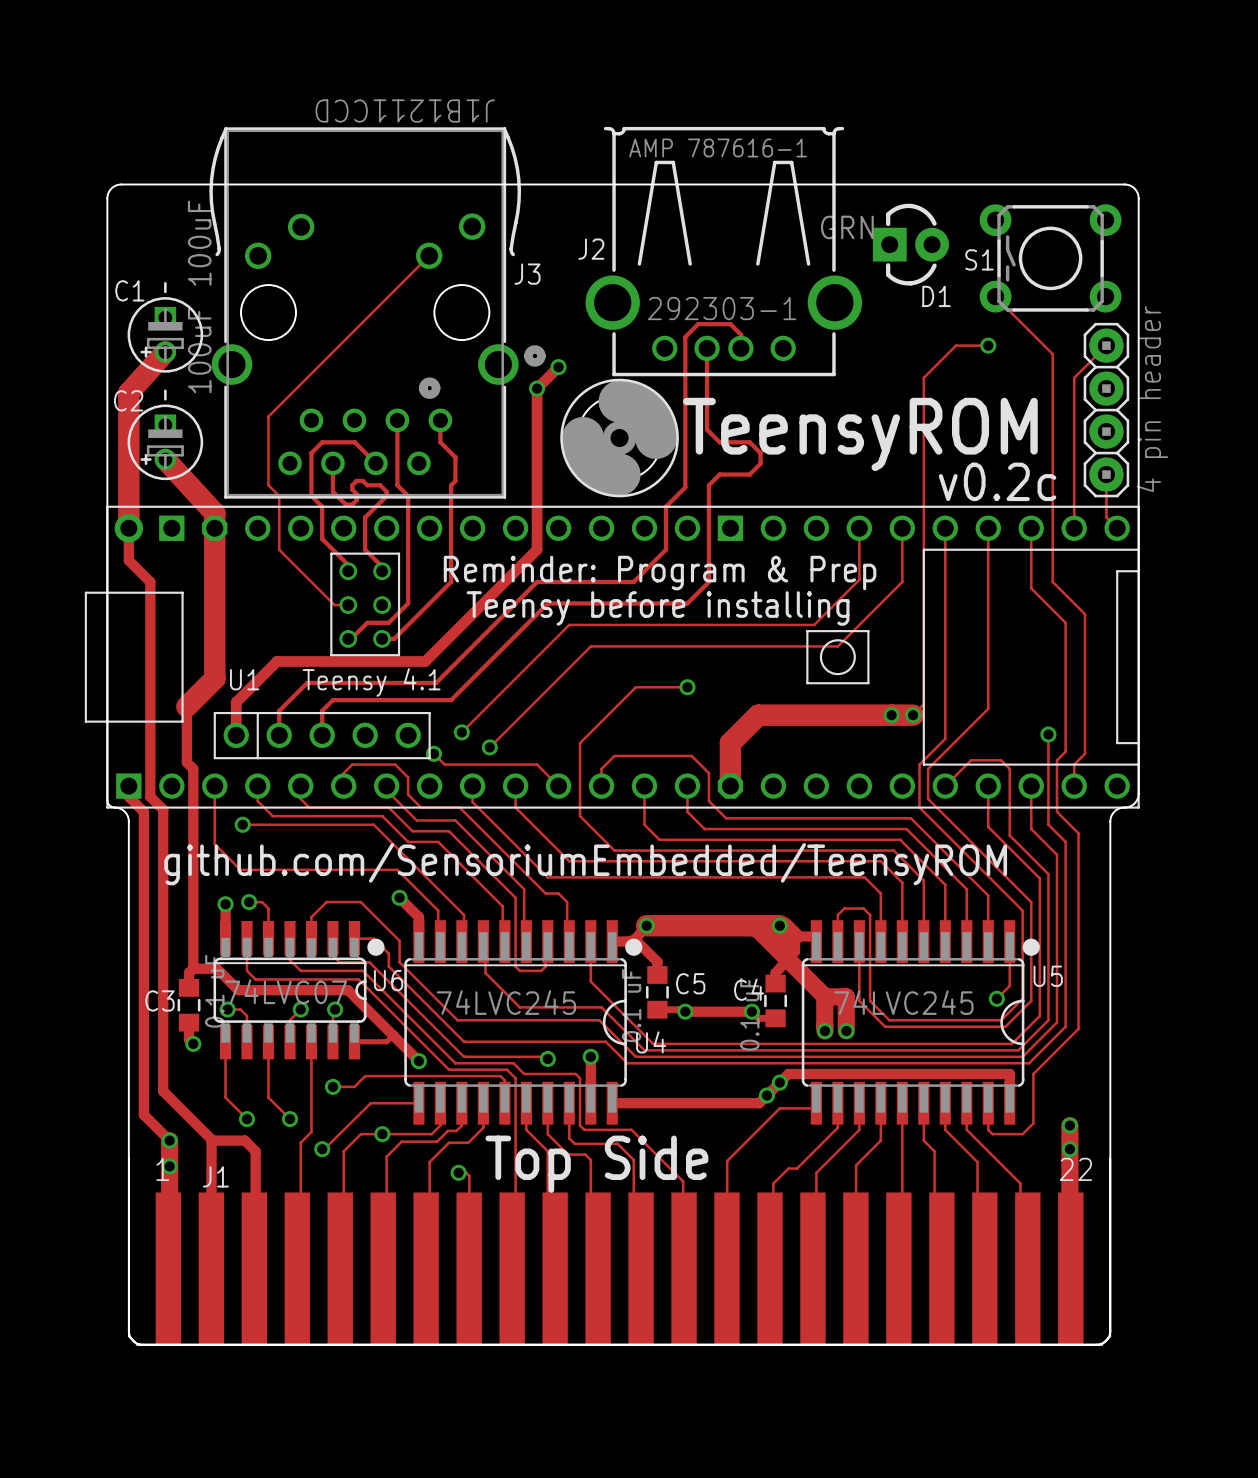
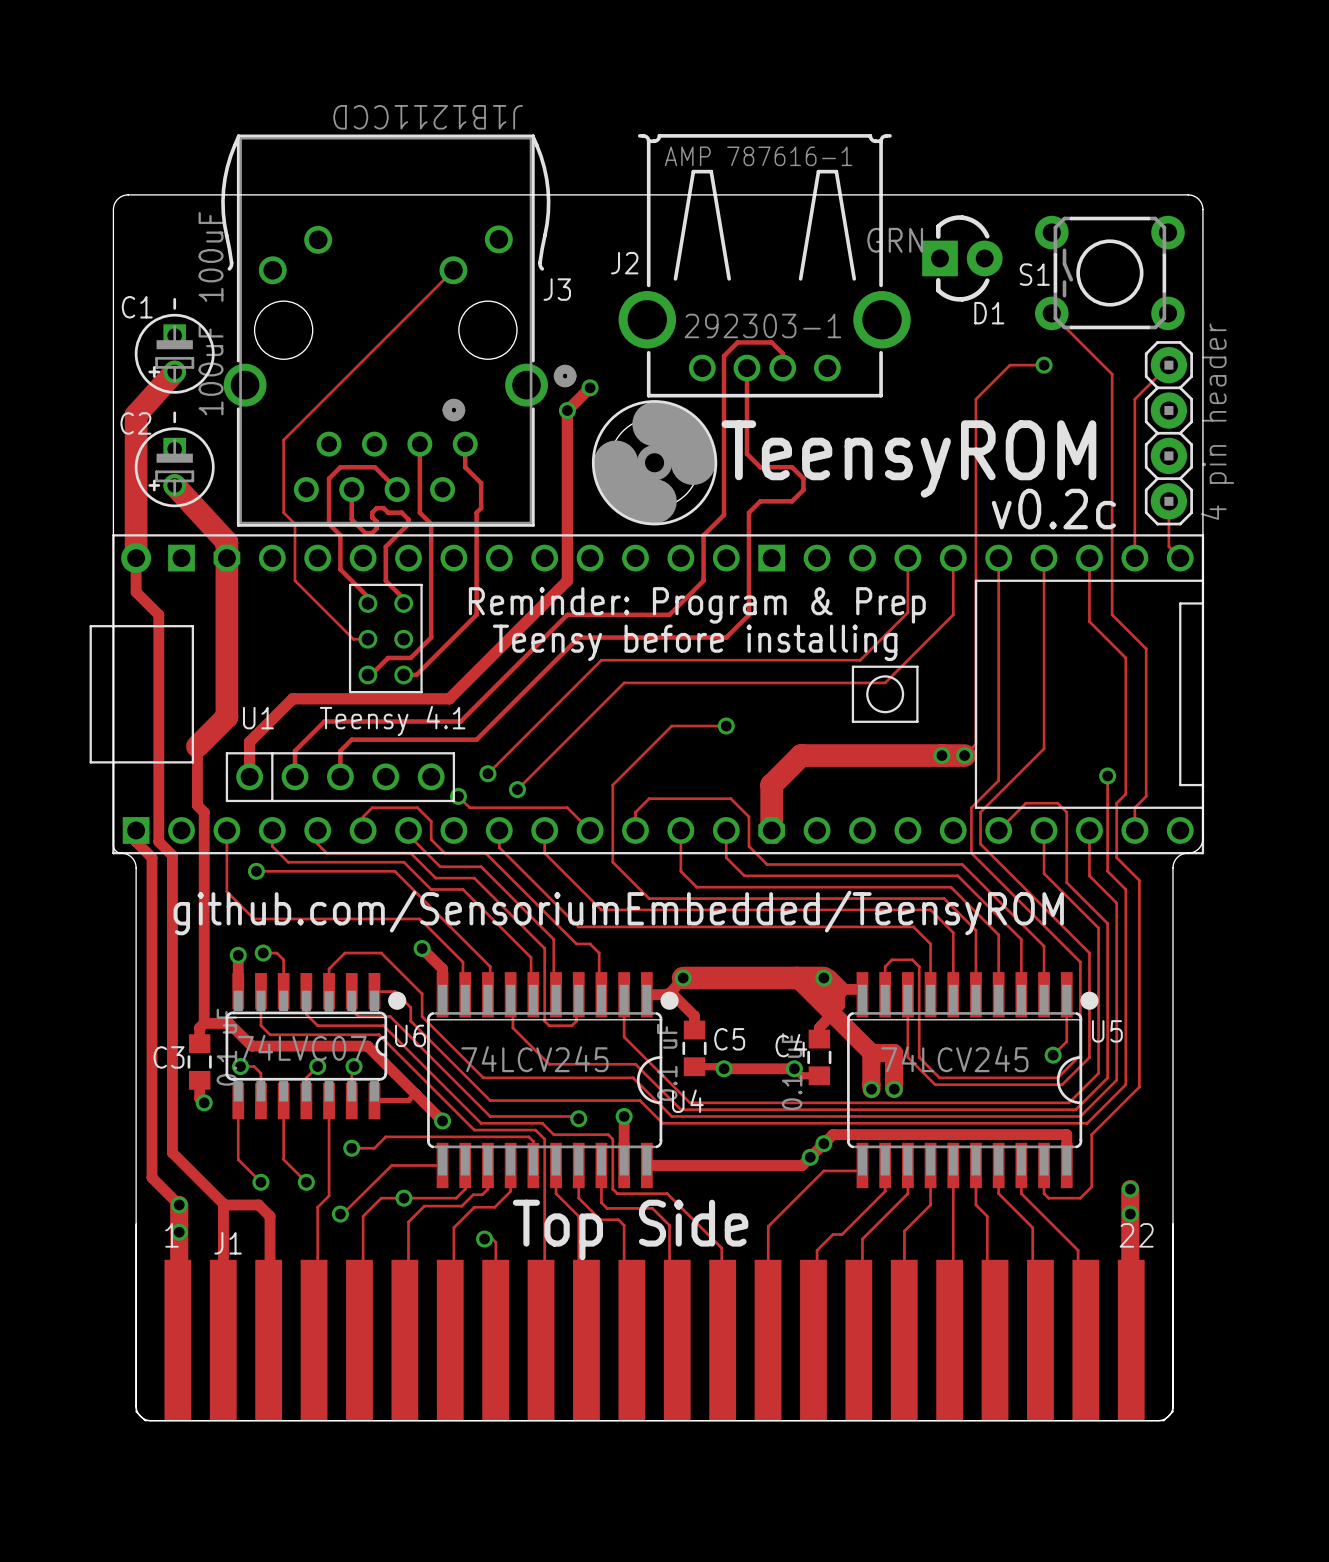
U4 value: 74LVC245 (506, 1002) -> 74LCV245 (534, 1059)
U5 value: 74LVC245 (903, 1002) -> 74LCV245 (954, 1059)

